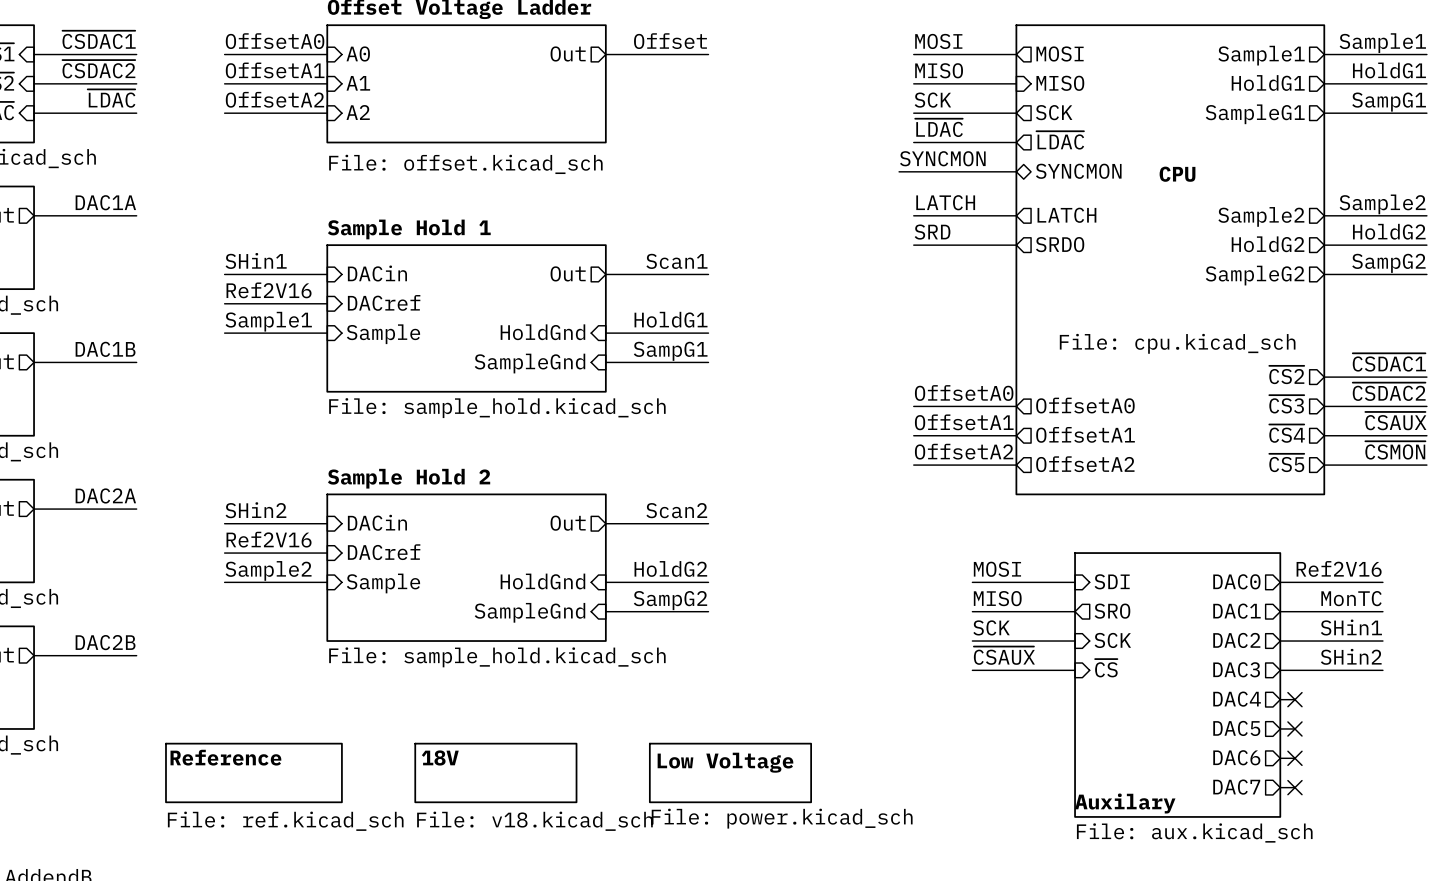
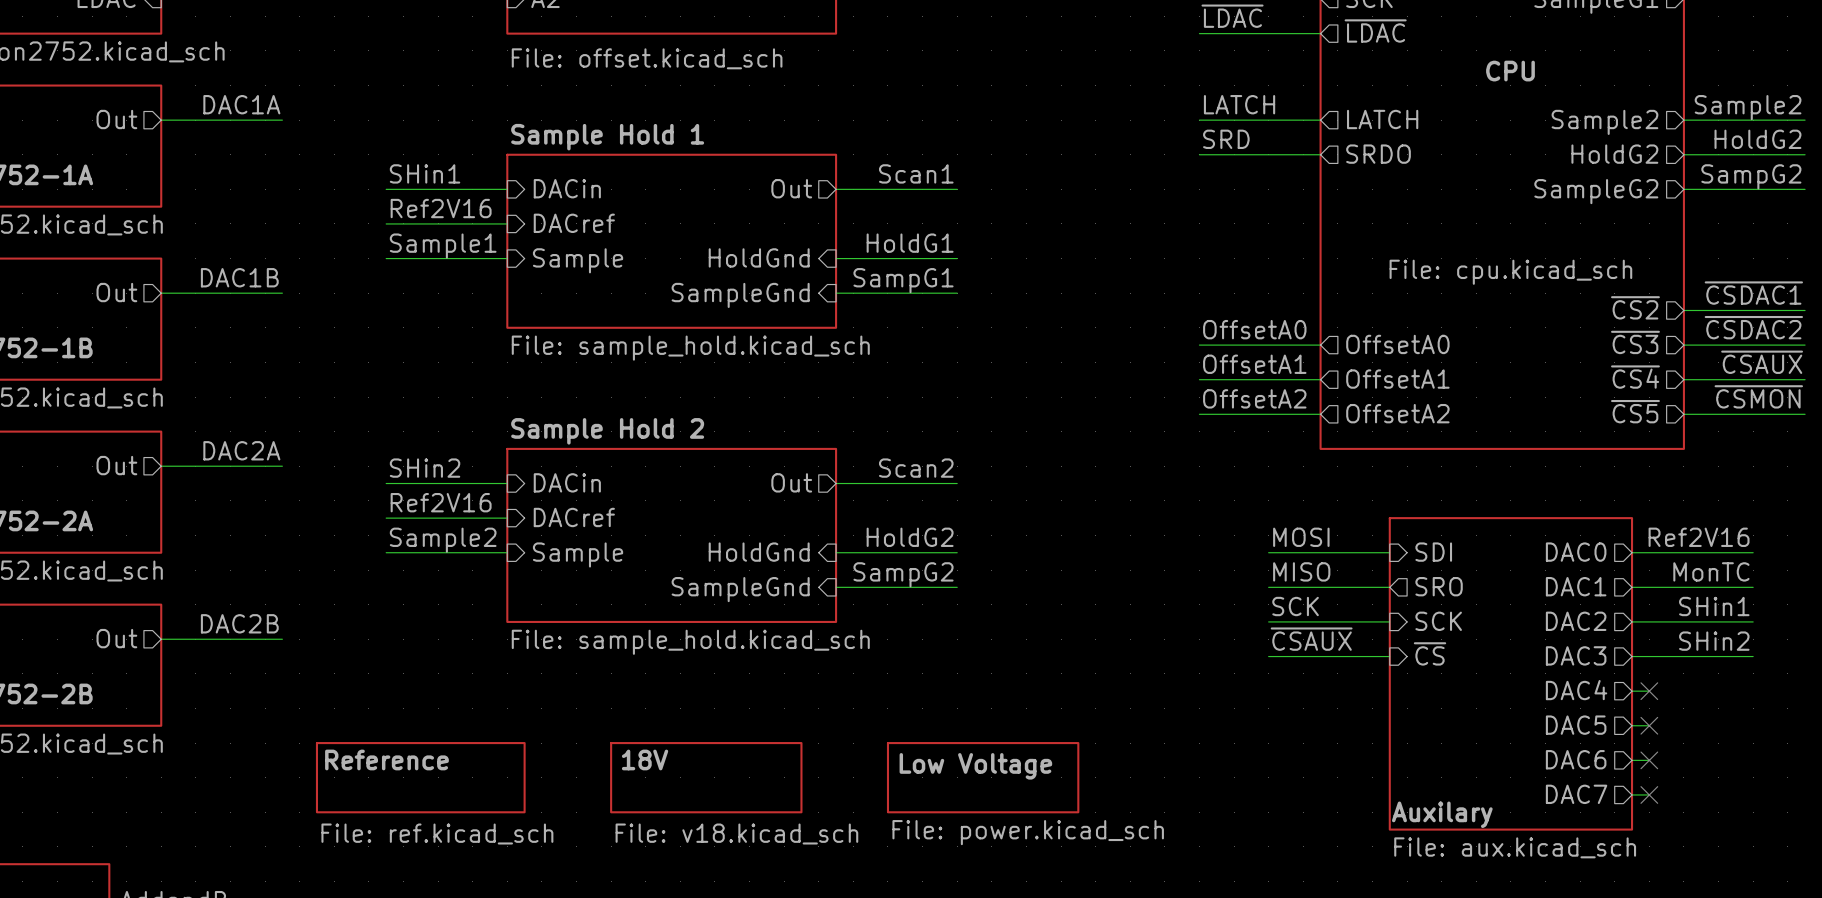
label: SYNCMON (942, 158) -> none
wire: (899, 171) (1016, 171) -> none
sheet pin: SYNCMON (1078, 171) -> none

